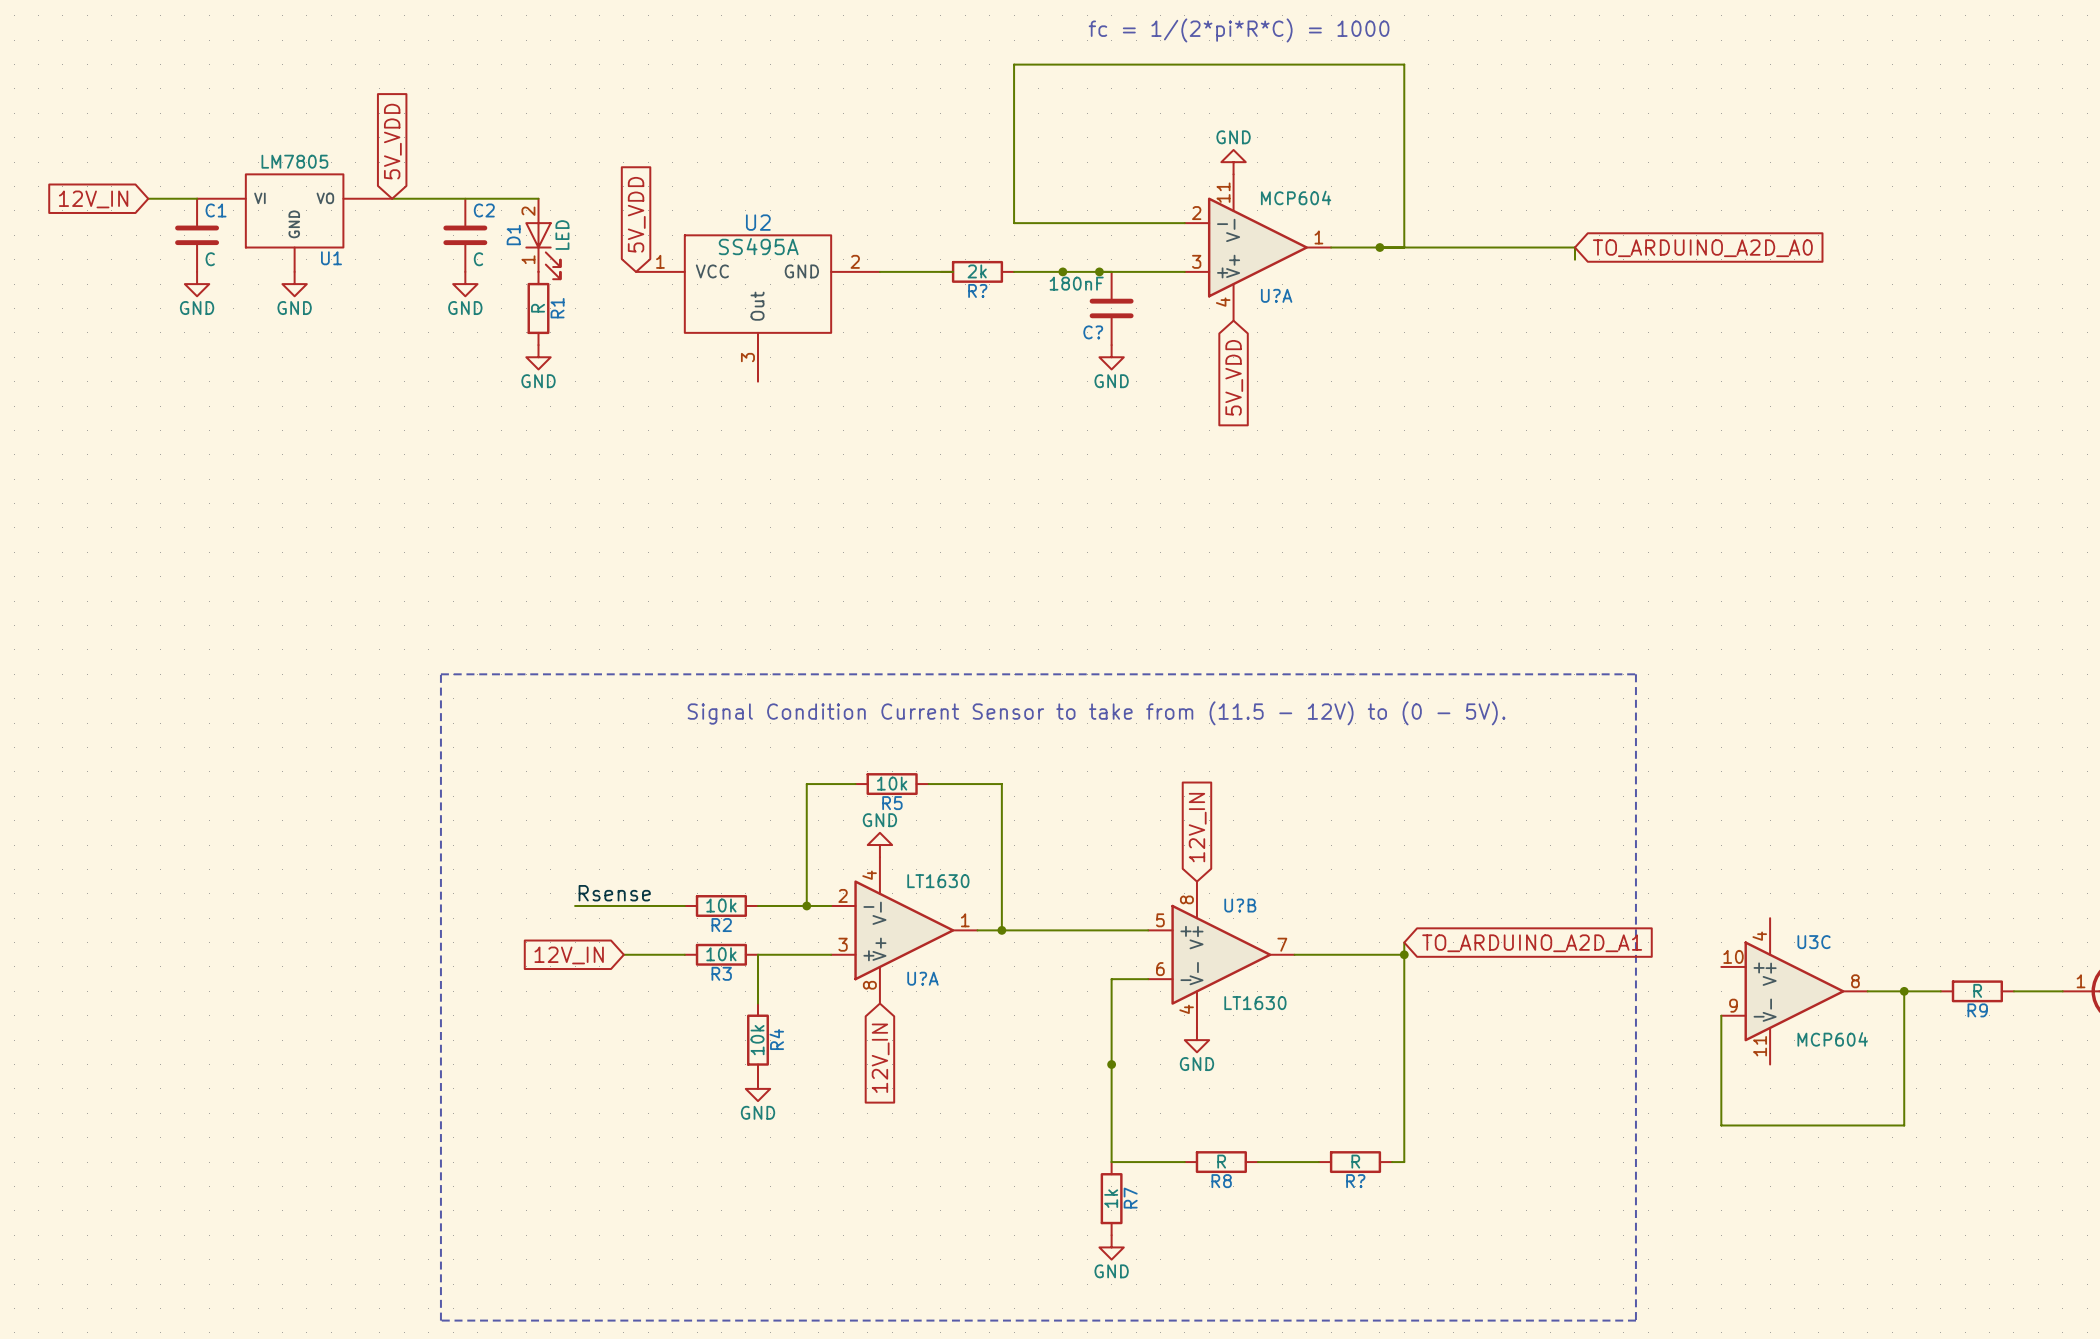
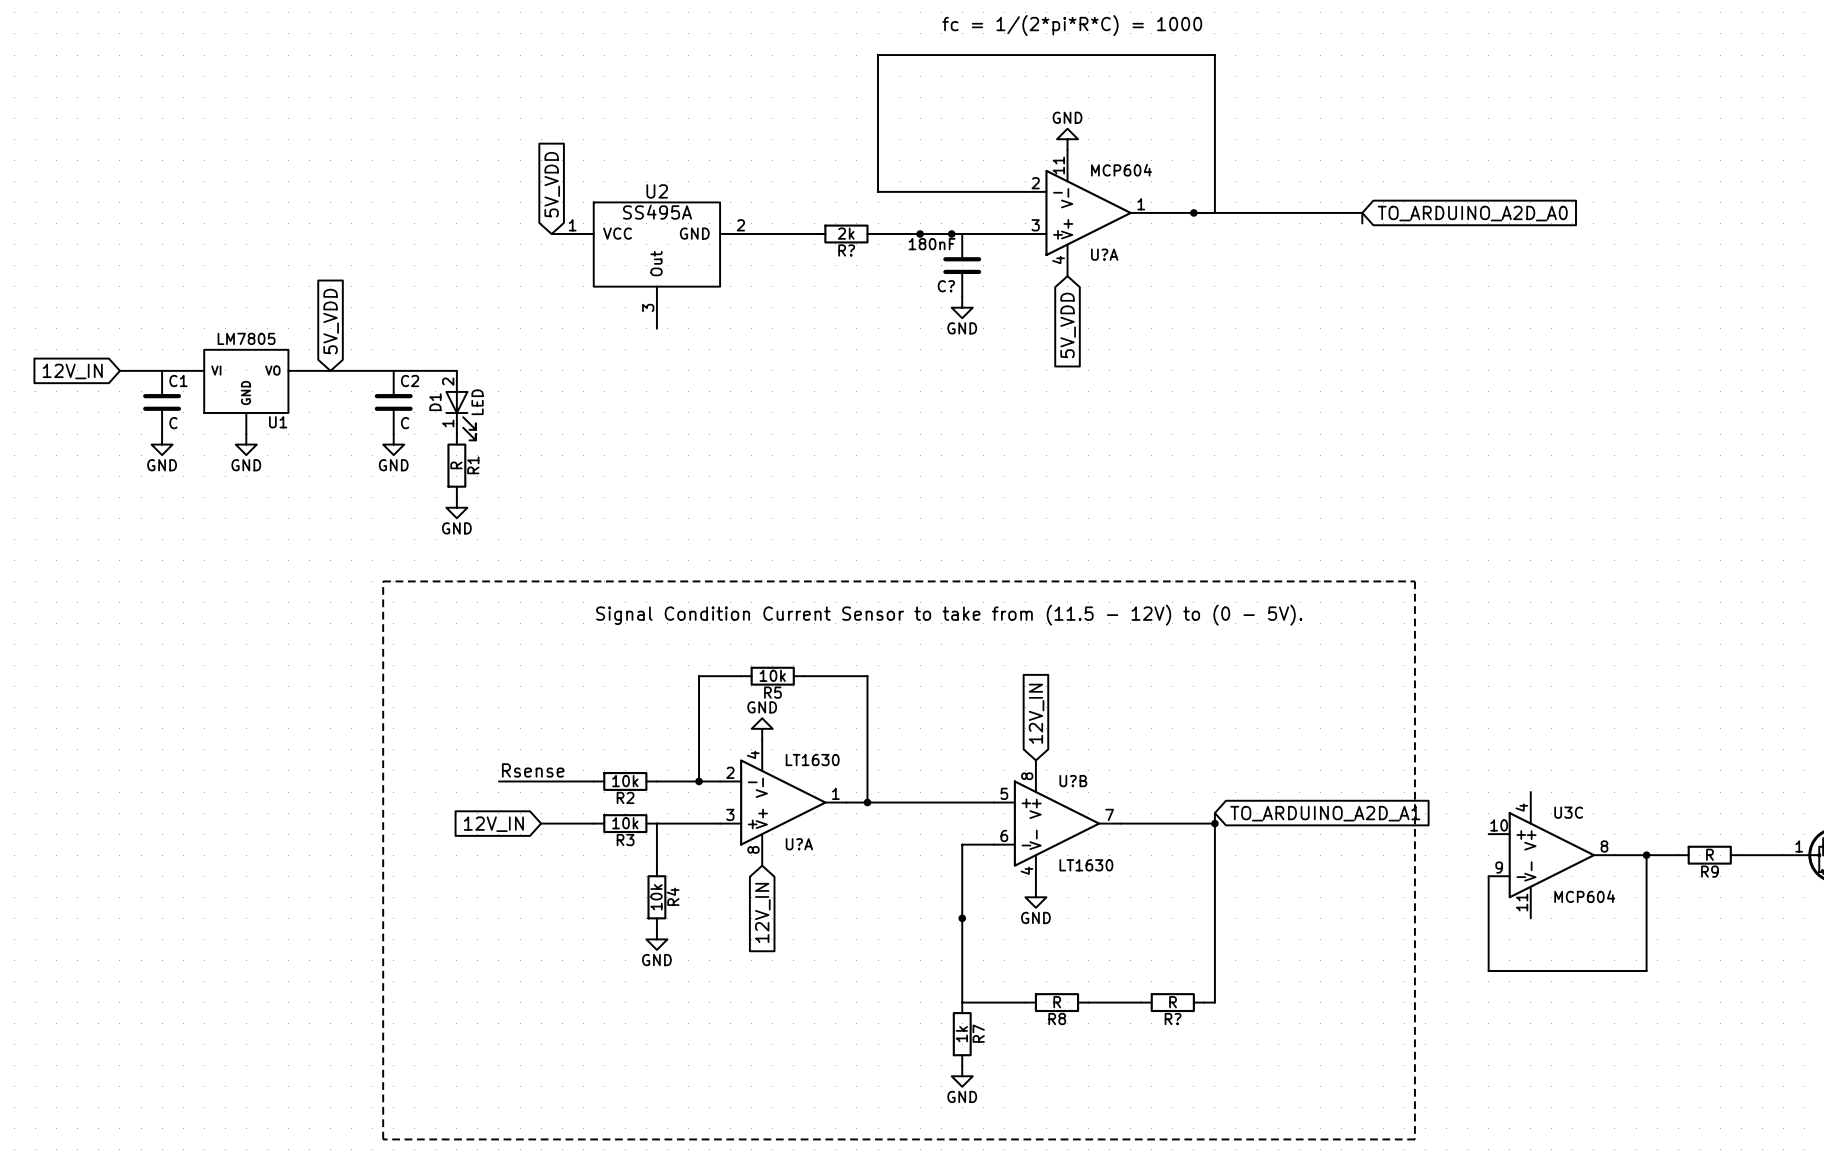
global label position: 5V_VDD (392, 141) -> 5V_VDD (331, 321)
wire: (148, 198) (197, 198) -> (119, 370) (162, 370)
wire: (392, 198) (538, 198) -> (330, 370) (456, 370)
global label position: 12V_IN (93, 199) -> 12V_IN (72, 371)
U1 position: (294, 223) -> (246, 391)
C1 position: (197, 235) -> (162, 402)
C2 position: (465, 235) -> (393, 402)
D1 position: (542, 238) -> (460, 405)
power symbol: GND (197, 284) -> none
power symbol: GND (294, 284) -> none
power symbol: GND (465, 284) -> none
R1 position: (538, 308) -> (456, 465)
power symbol: GND (538, 357) -> none
power symbol: none -> GND (162, 444)
power symbol: none -> GND (246, 444)
power symbol: none -> GND (393, 444)
power symbol: none -> GND (456, 507)

